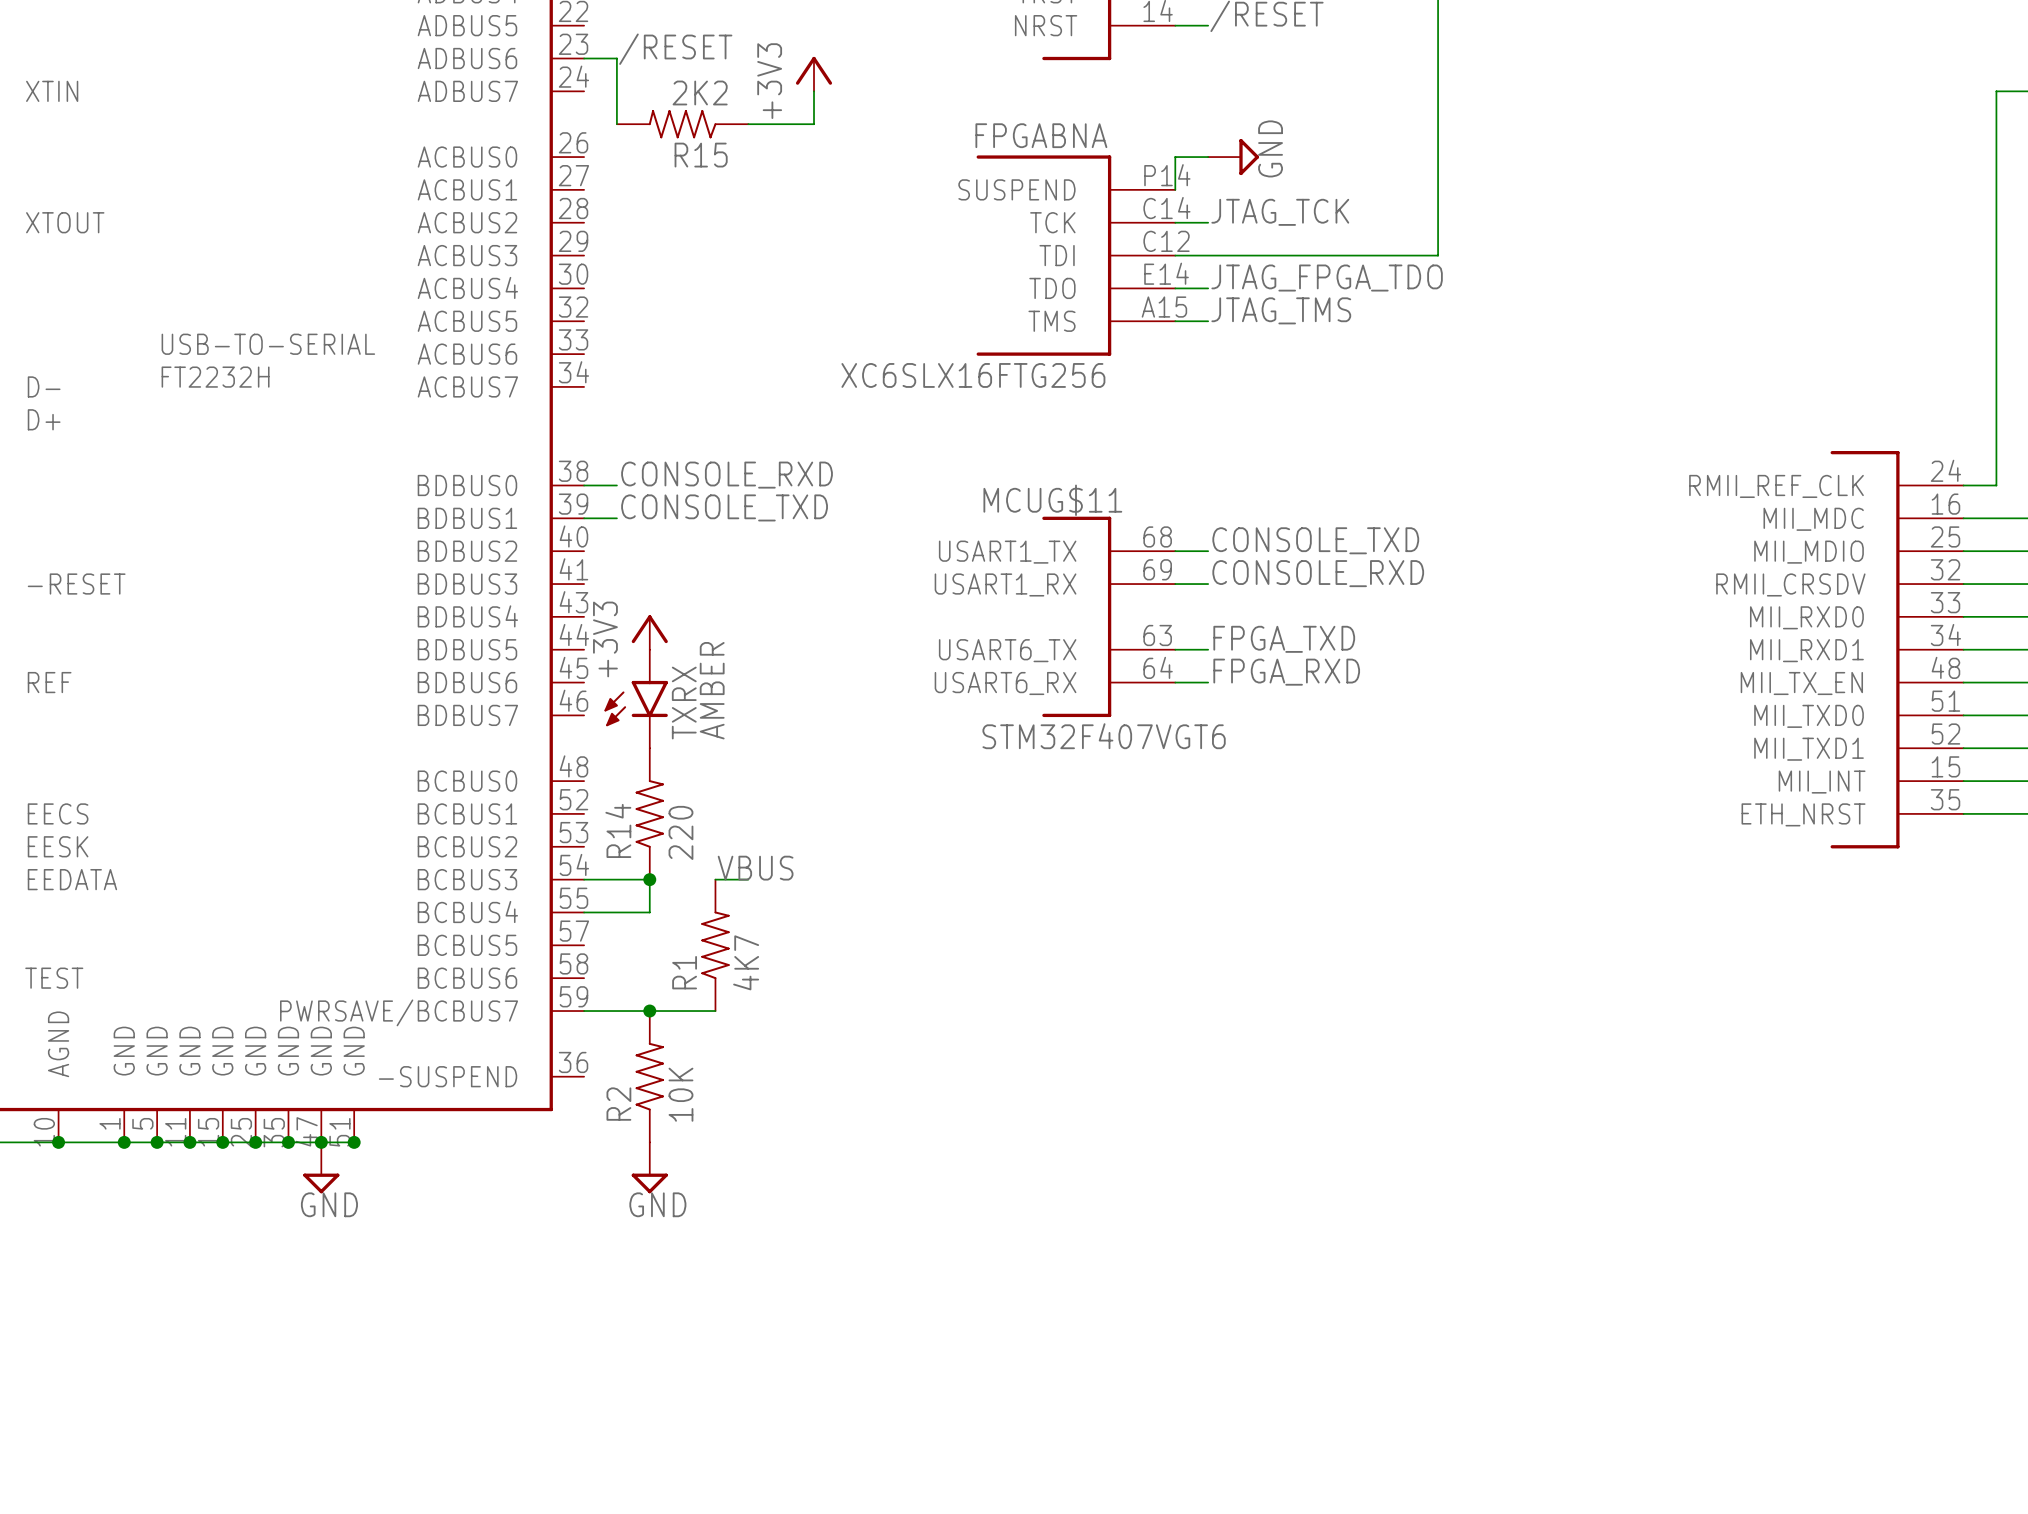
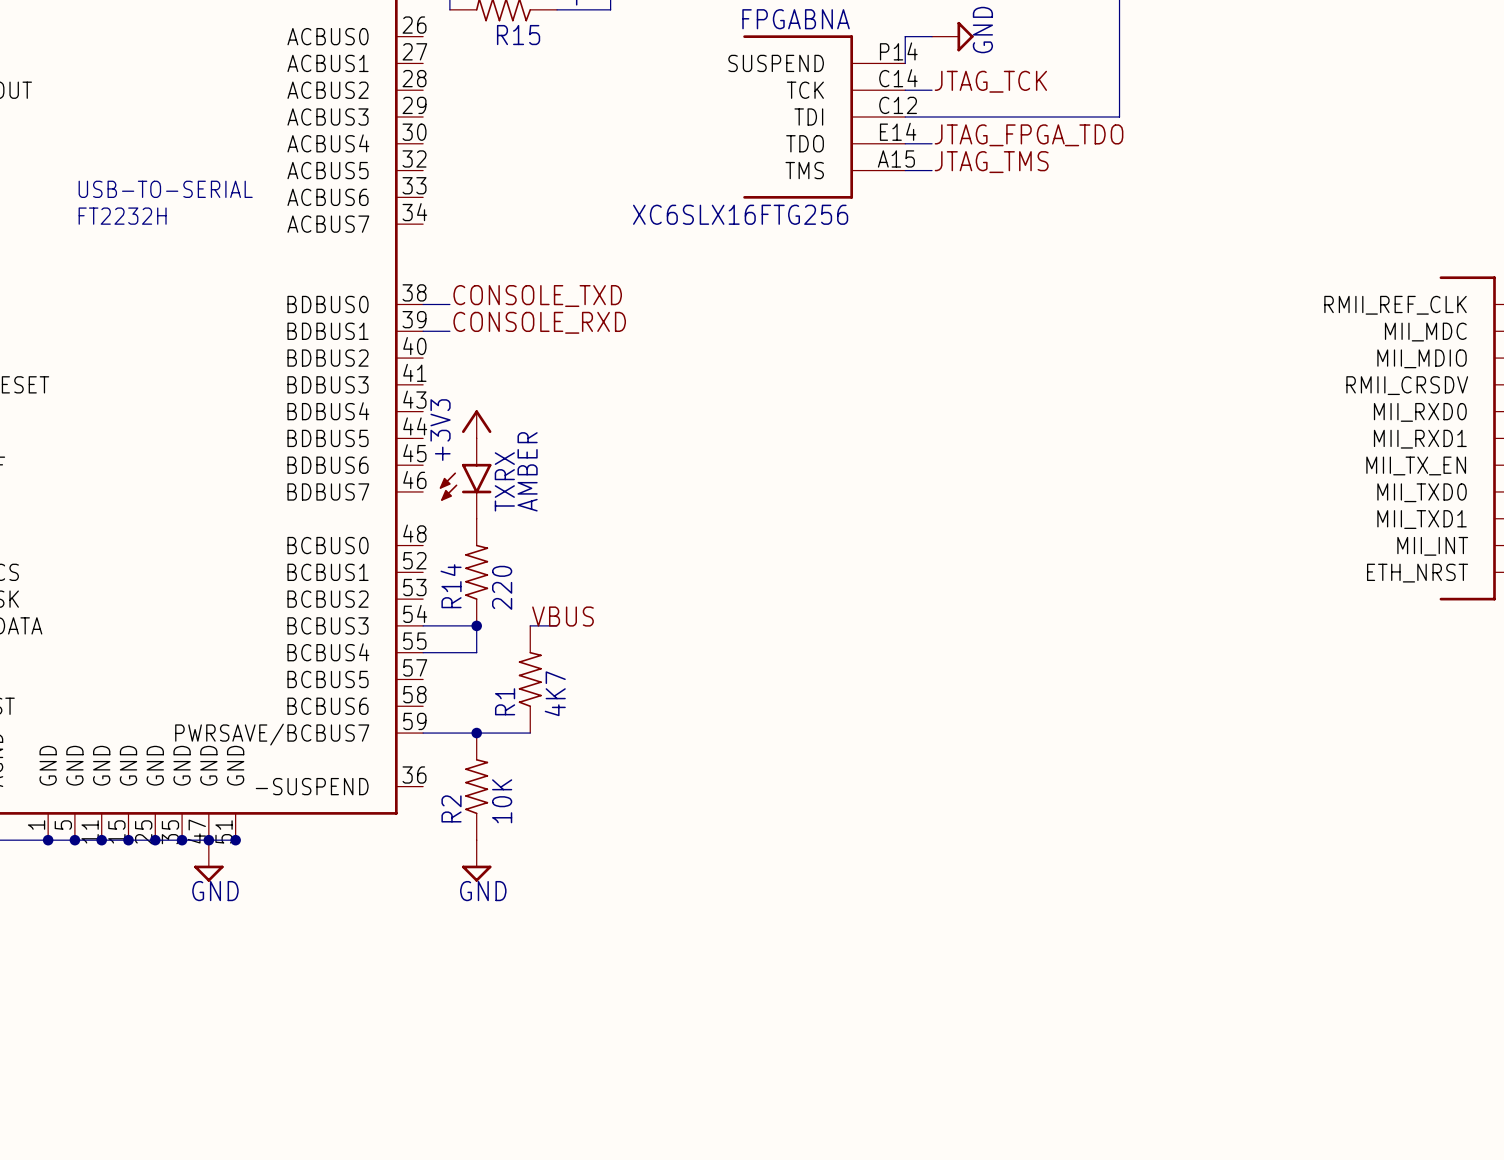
label: CONSOLE_RXD (727, 475) -> CONSOLE_TXD (537, 296)
label: CONSOLE_TXD (724, 507) -> CONSOLE_RXD (539, 322)
label: CONSOLE_TXD (1315, 540) -> none
wire: (1175, 551) (1208, 551) -> none
label: CONSOLE_RXD (1318, 573) -> none
wire: (1175, 584) (1208, 584) -> none
MCUG$11: STM32F407VGT6 (1108, 616) -> none
label: FPGA_TXD (1284, 639) -> none
wire: (1175, 649) (1208, 649) -> none
label: FPGA_RXD (1286, 672) -> none
wire: (1175, 682) (1208, 682) -> none

